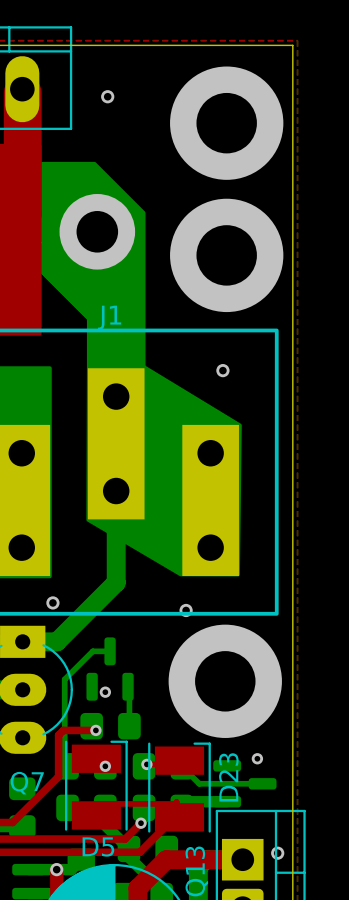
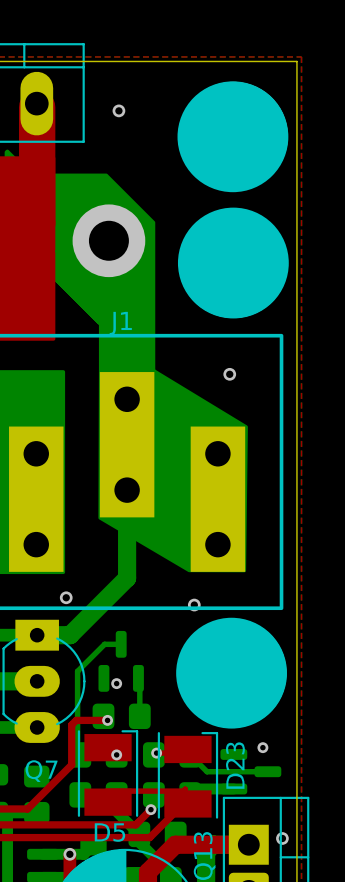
drawing: none -> [177, 81, 289, 319]
drawing: none -> [176, 617, 287, 729]

